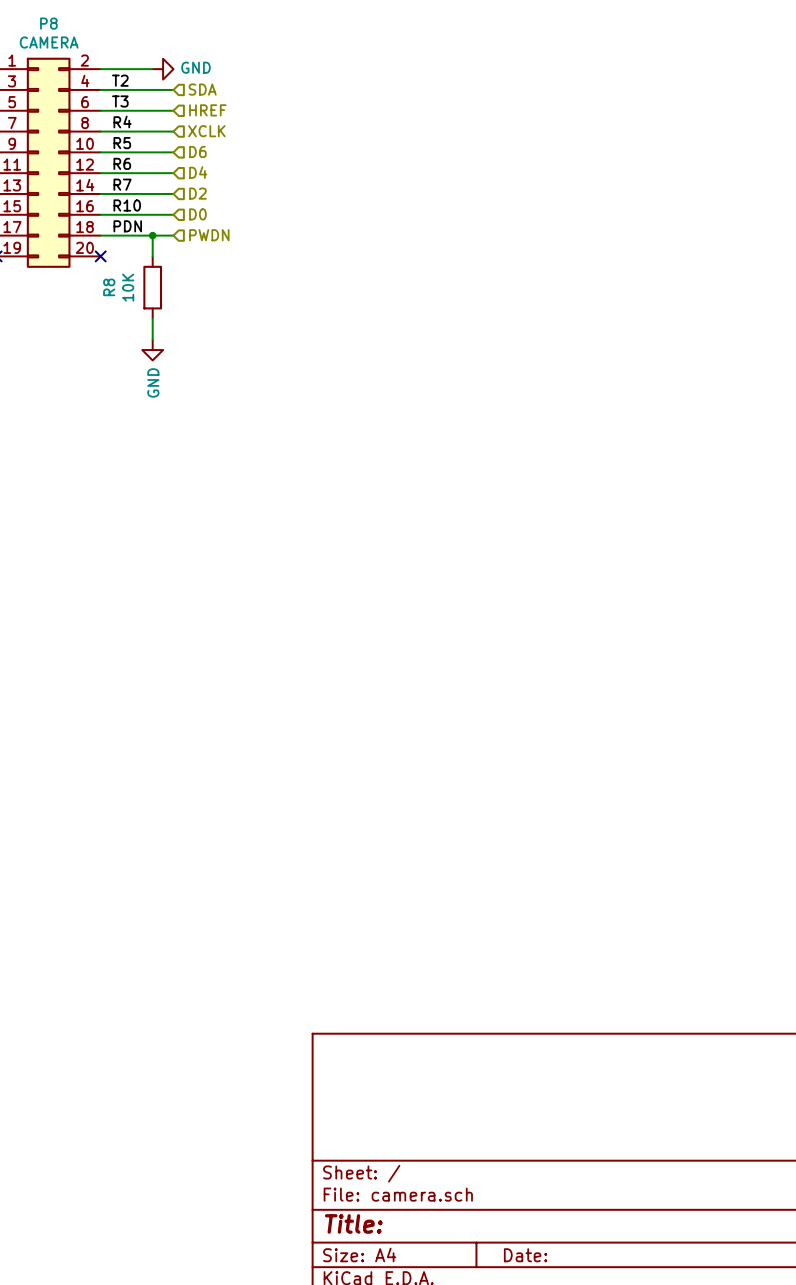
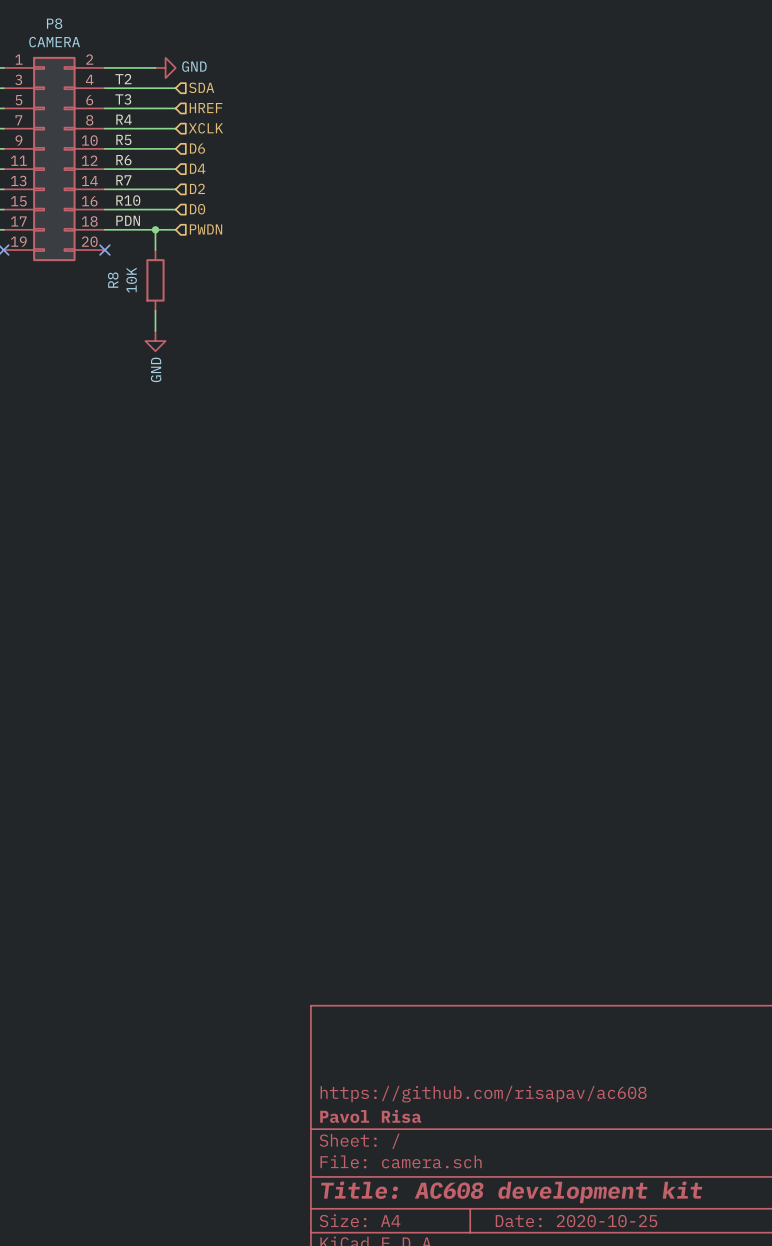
title block: none -> https://github.com/risapav/ac608 (483, 1094)
title block: none -> Pavol Risa (370, 1116)
title block: Title: (353, 1223) -> Title: AC608 development kit (511, 1192)
title block: Date: (525, 1255) -> Date: 2020-10-25 (576, 1221)

